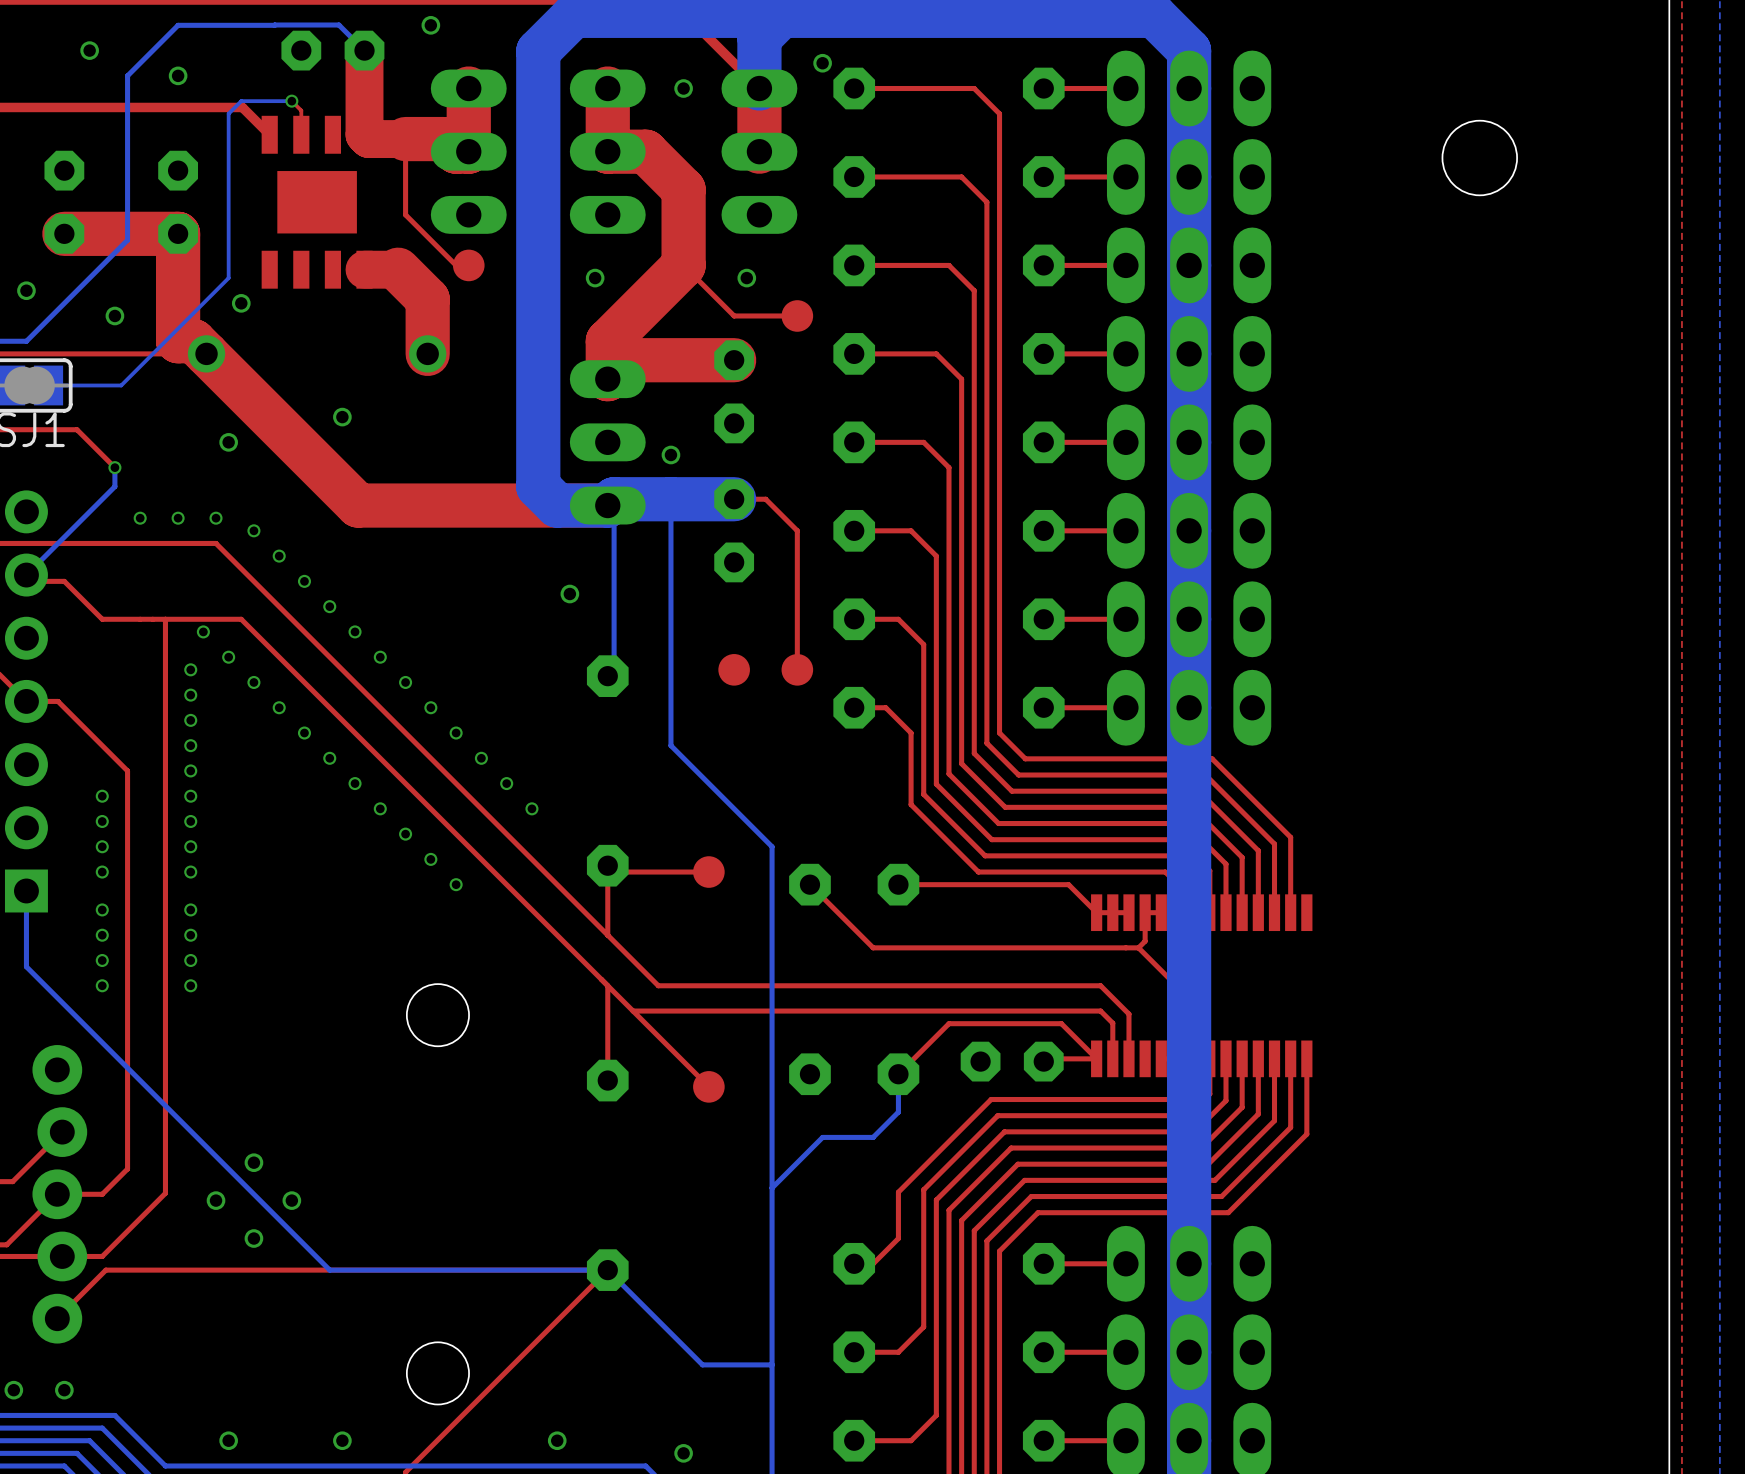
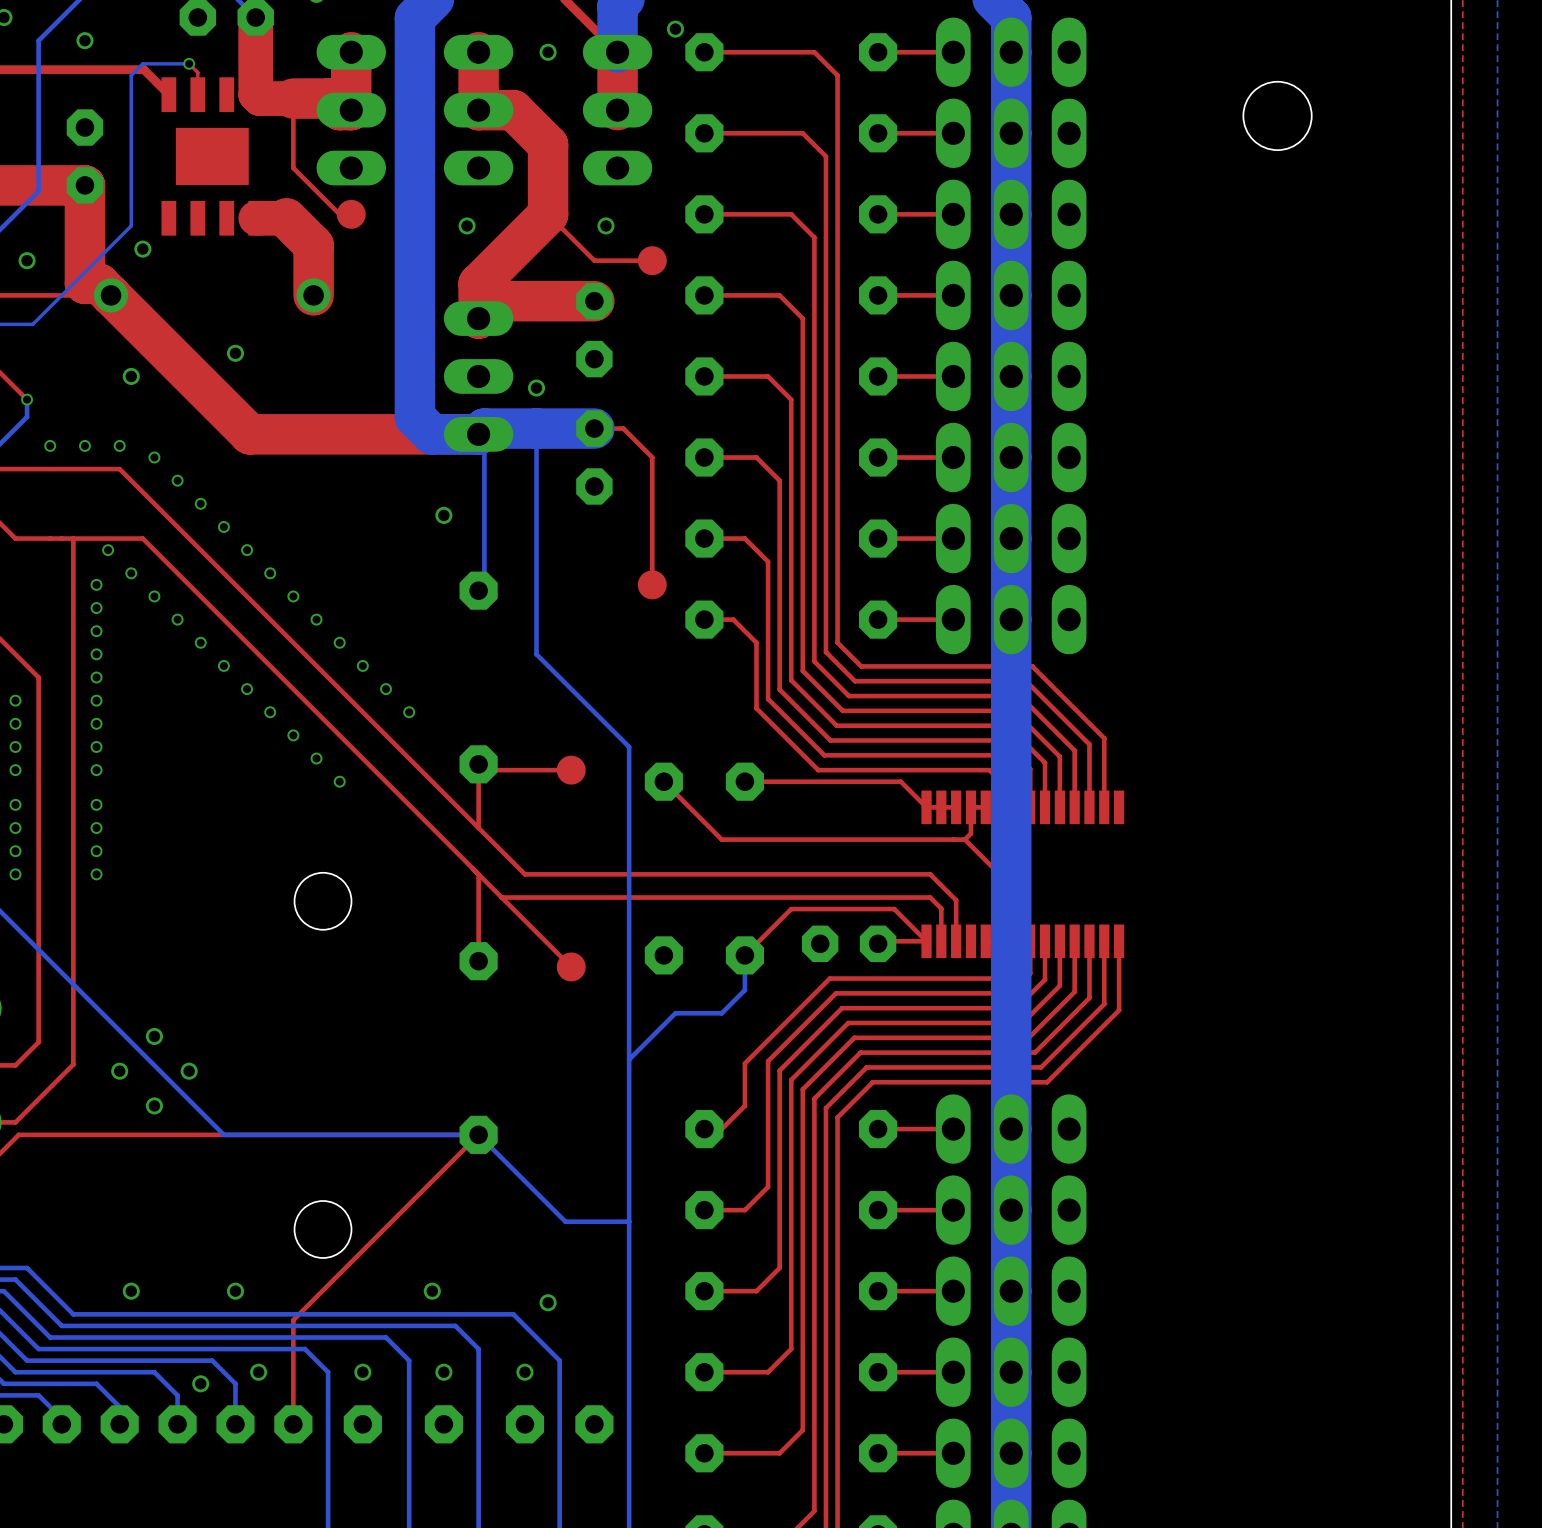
part: (734, 669) -> none

